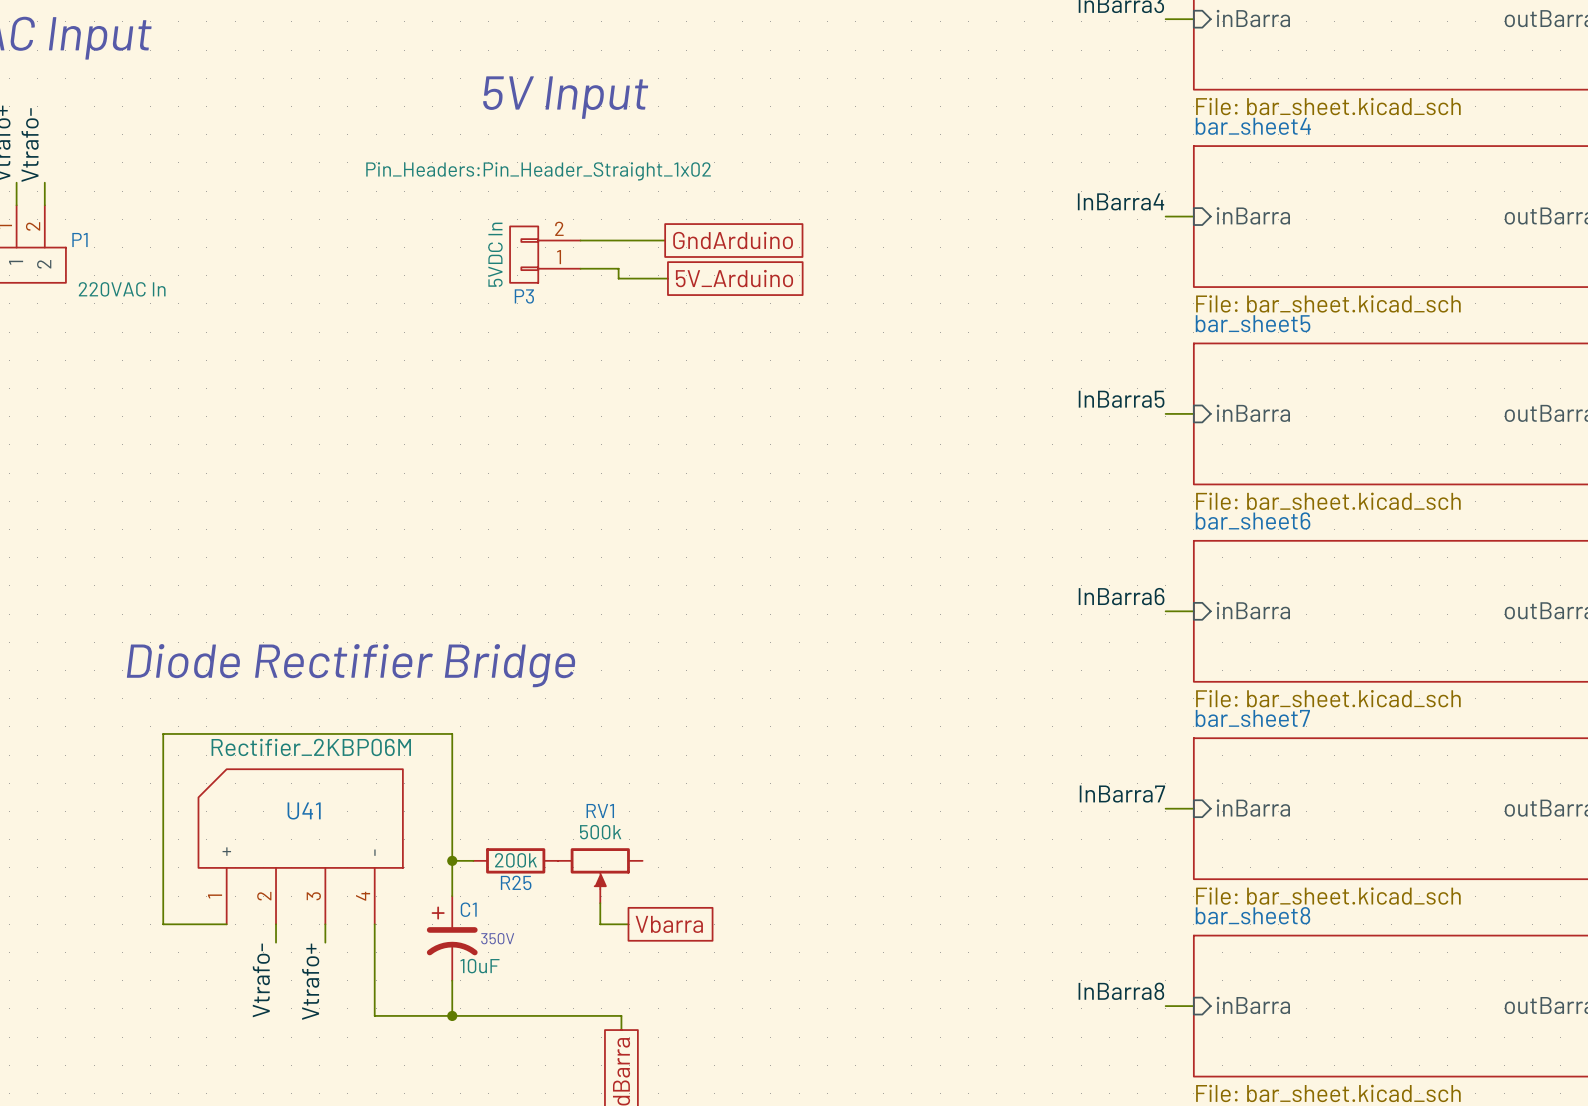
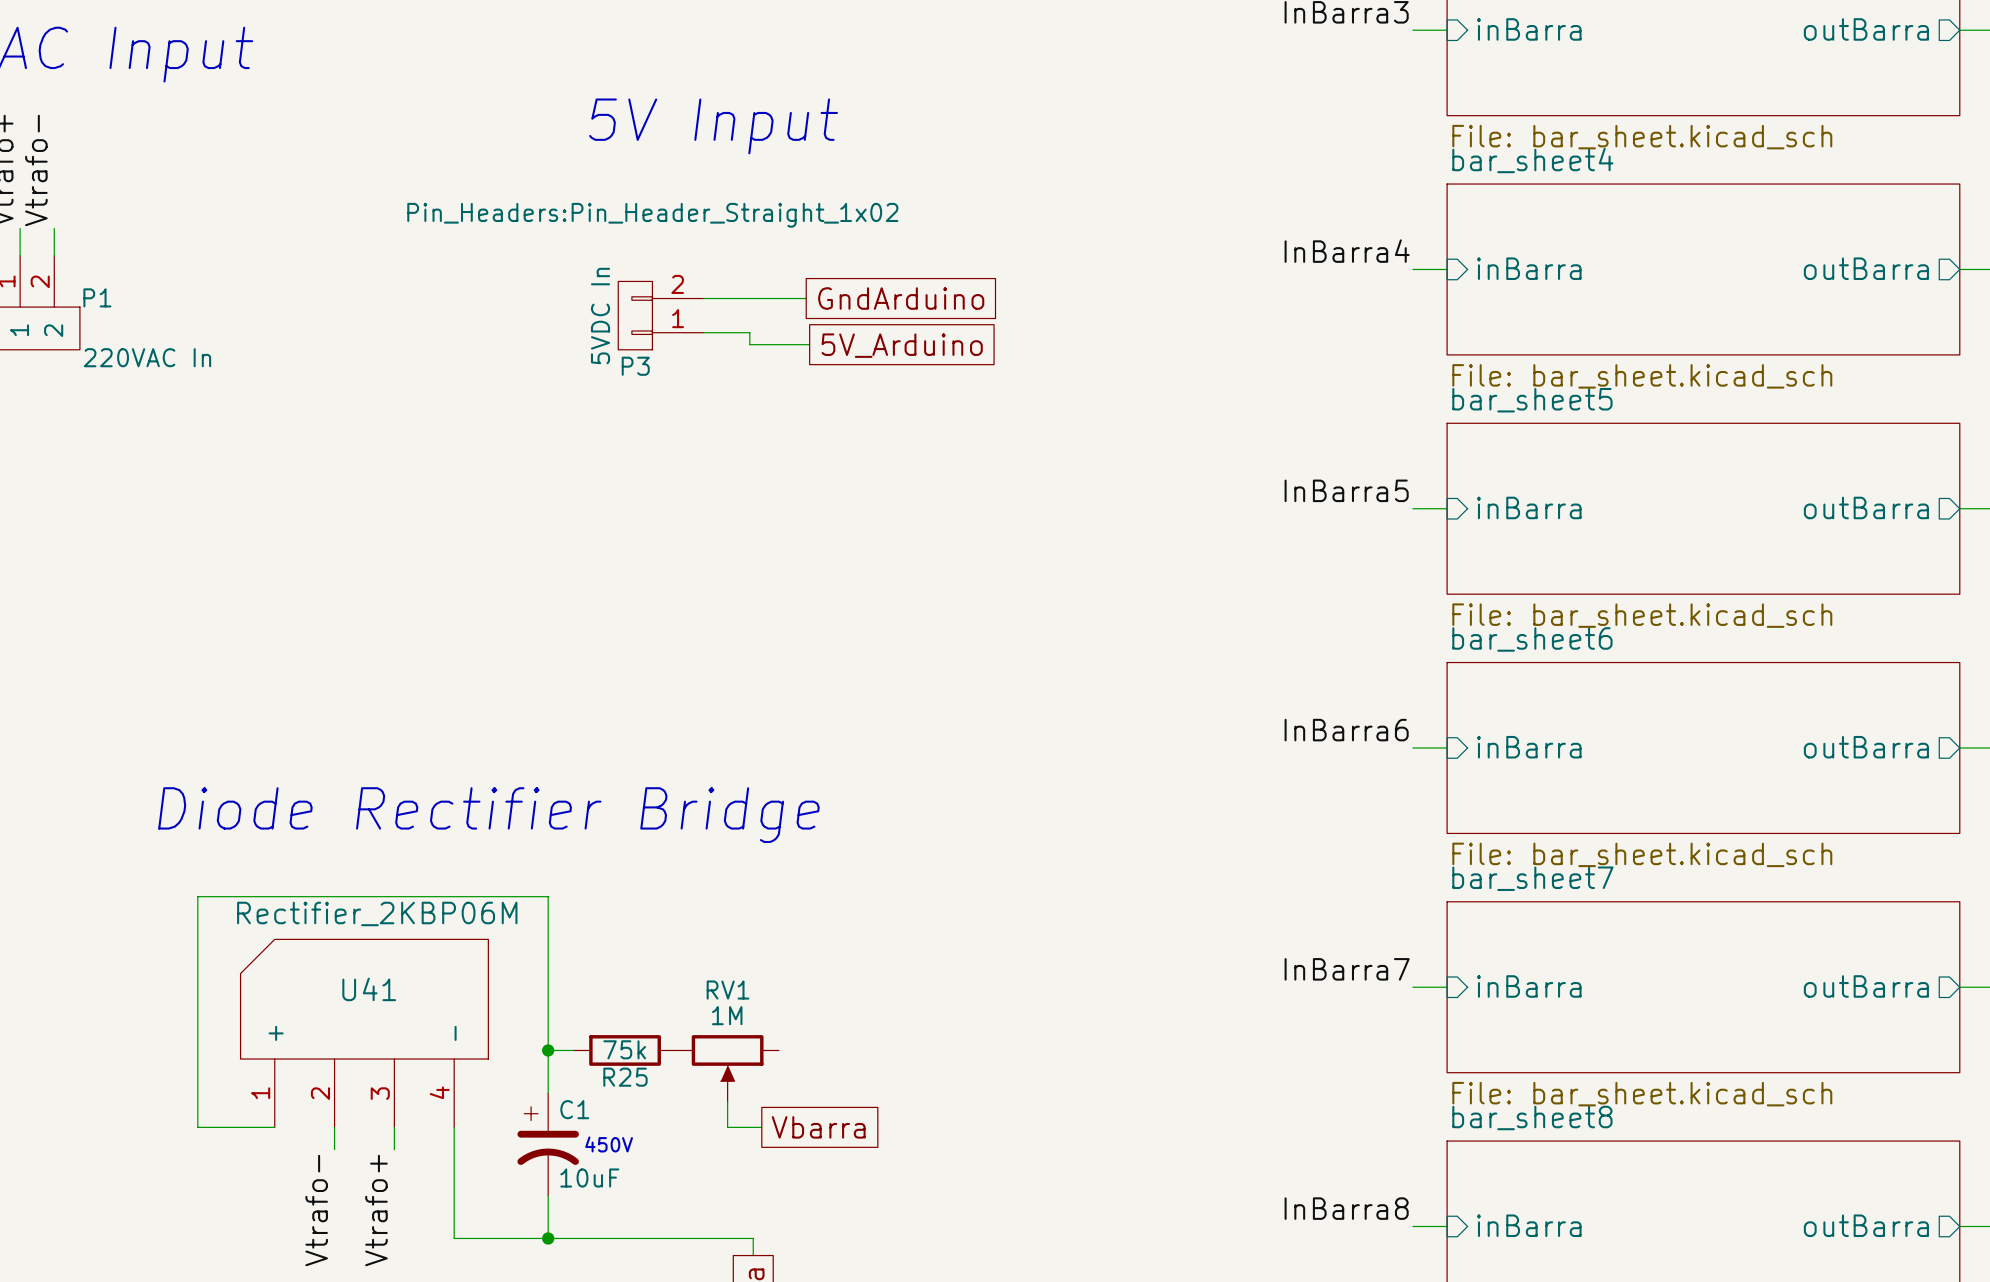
RV1 value: 500k (600, 832) -> 1M (727, 1015)
R25 value: 200k (515, 860) -> 75k (624, 1049)
text: 350V (497, 938) -> 450V (609, 1144)

